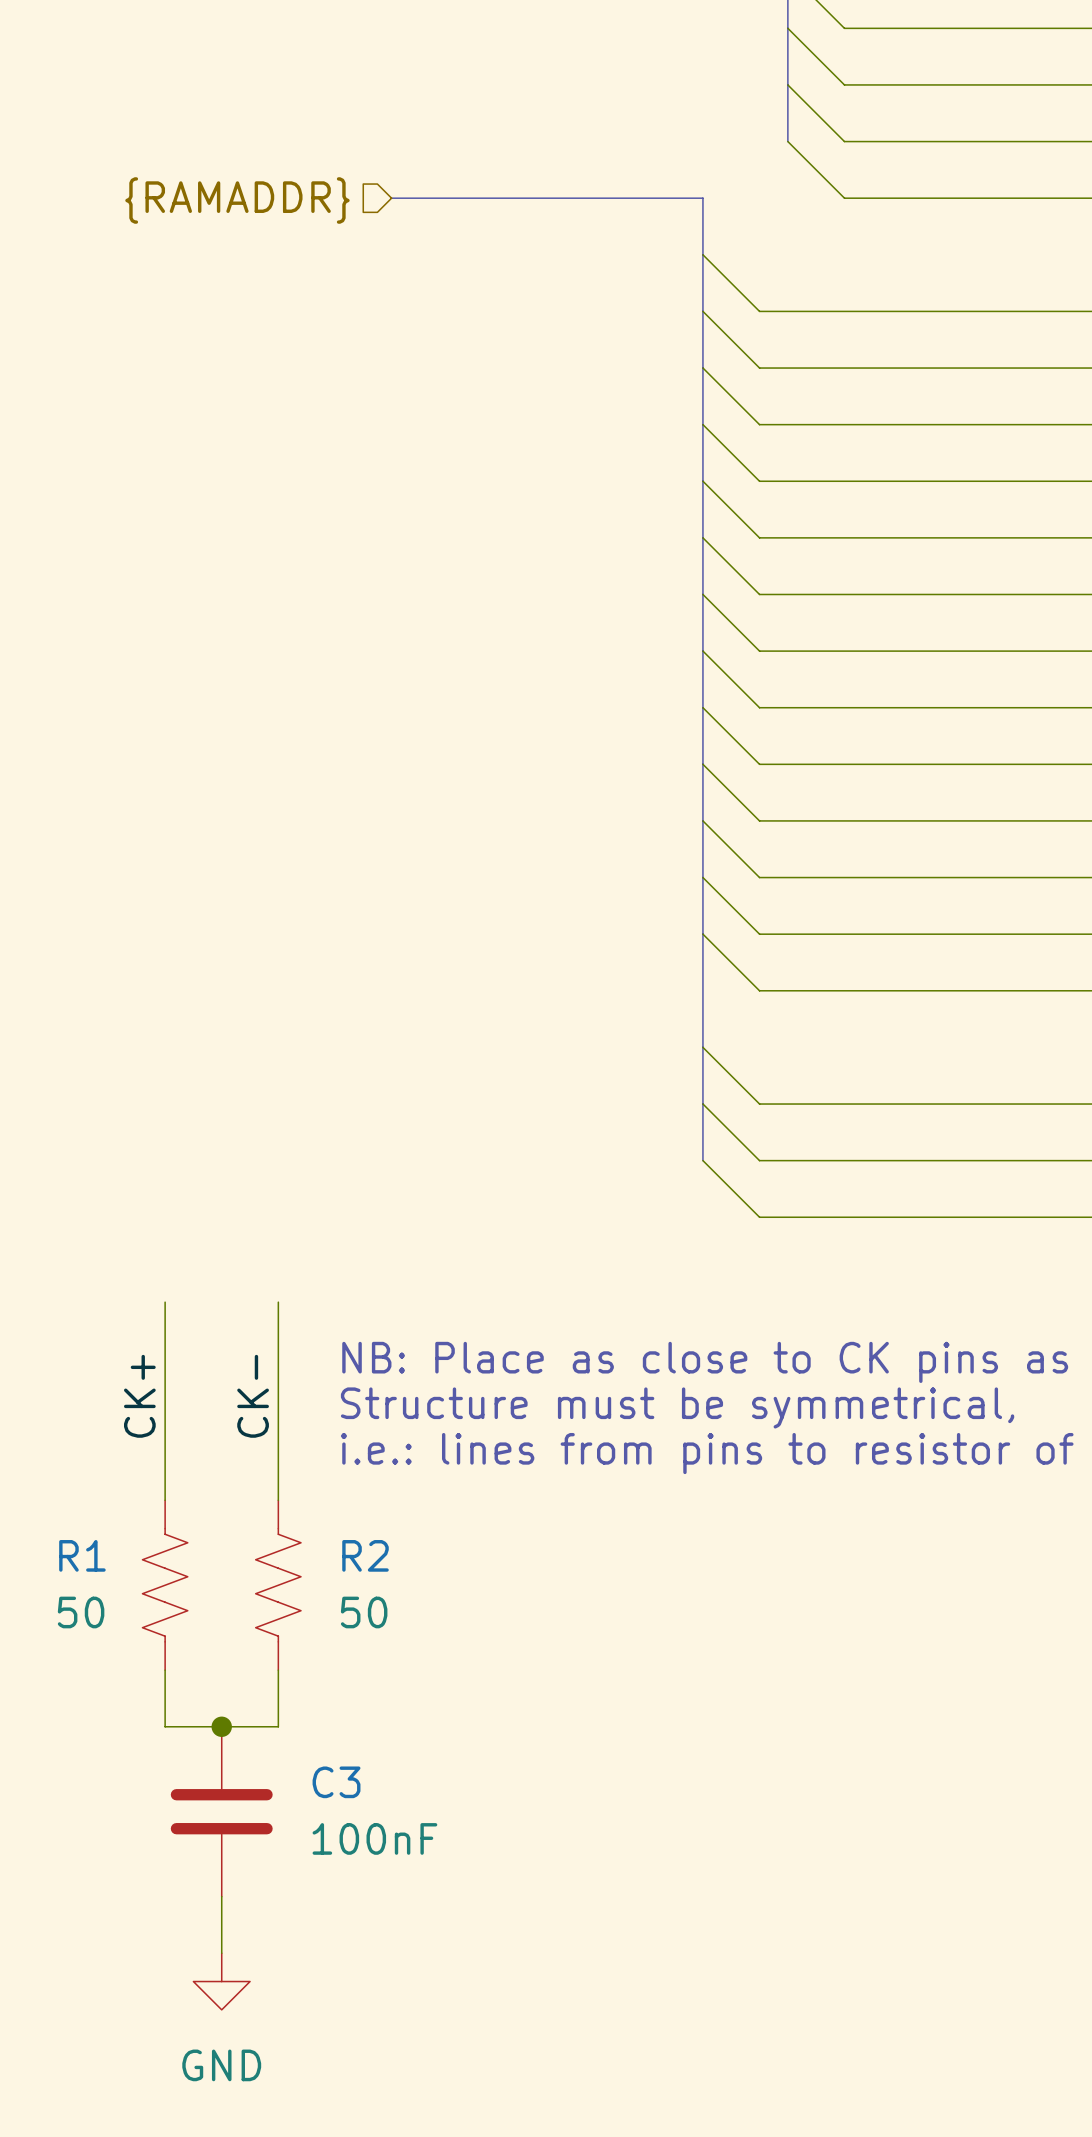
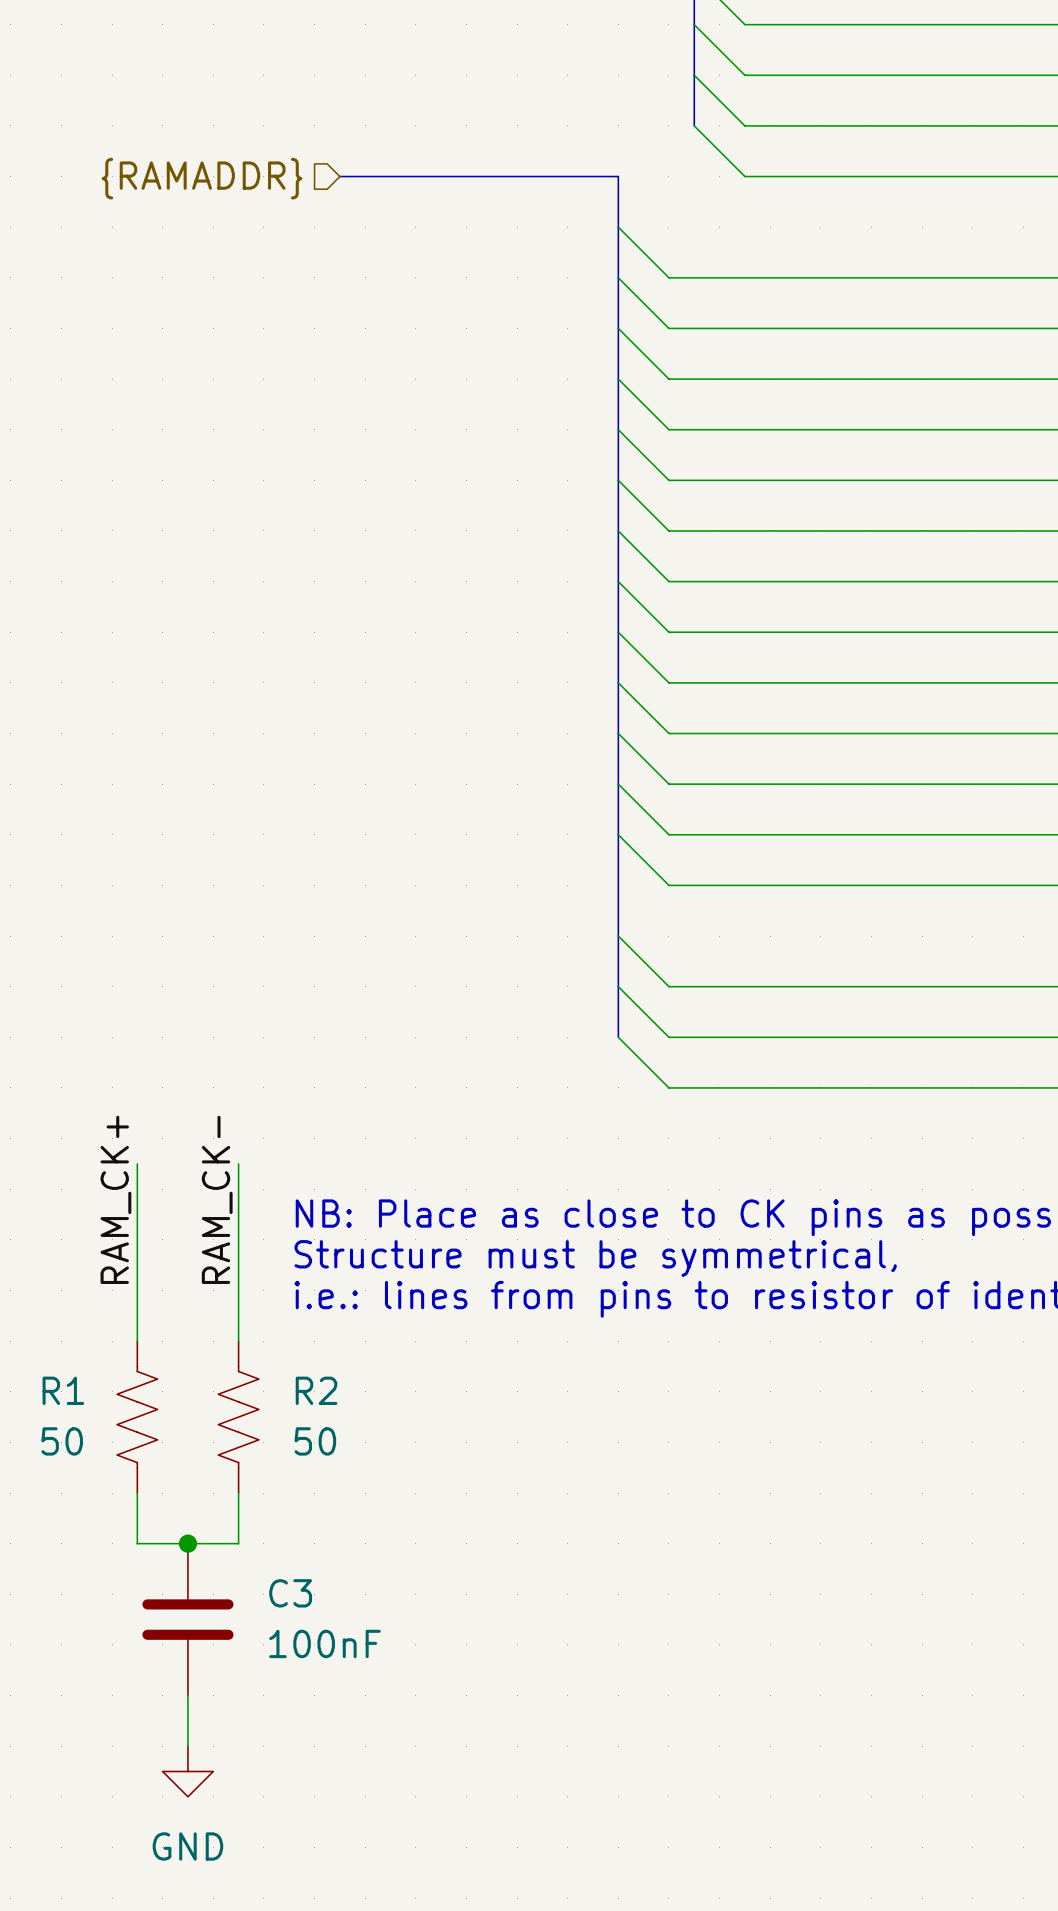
label: CK+ (139, 1396) -> RAM_CK+ (115, 1199)
label: CK- (253, 1396) -> RAM_CK- (217, 1199)

